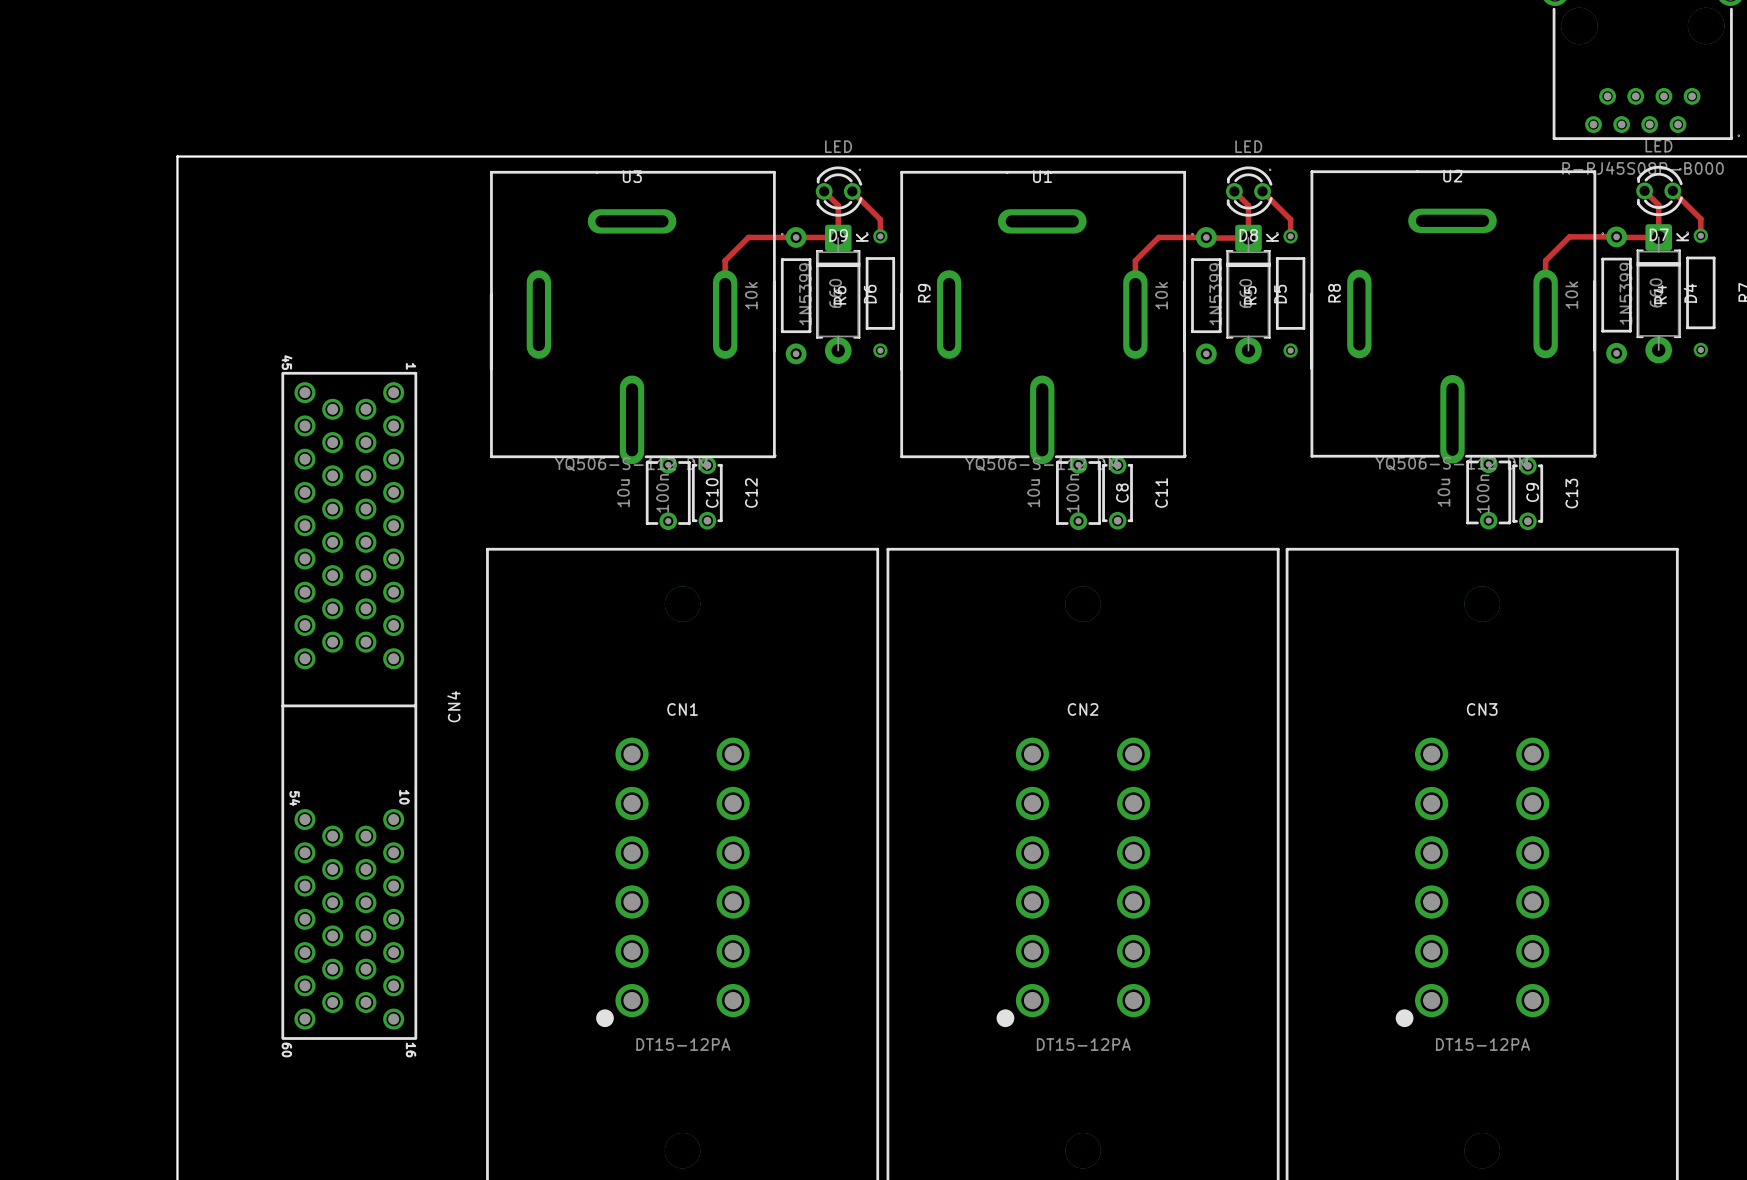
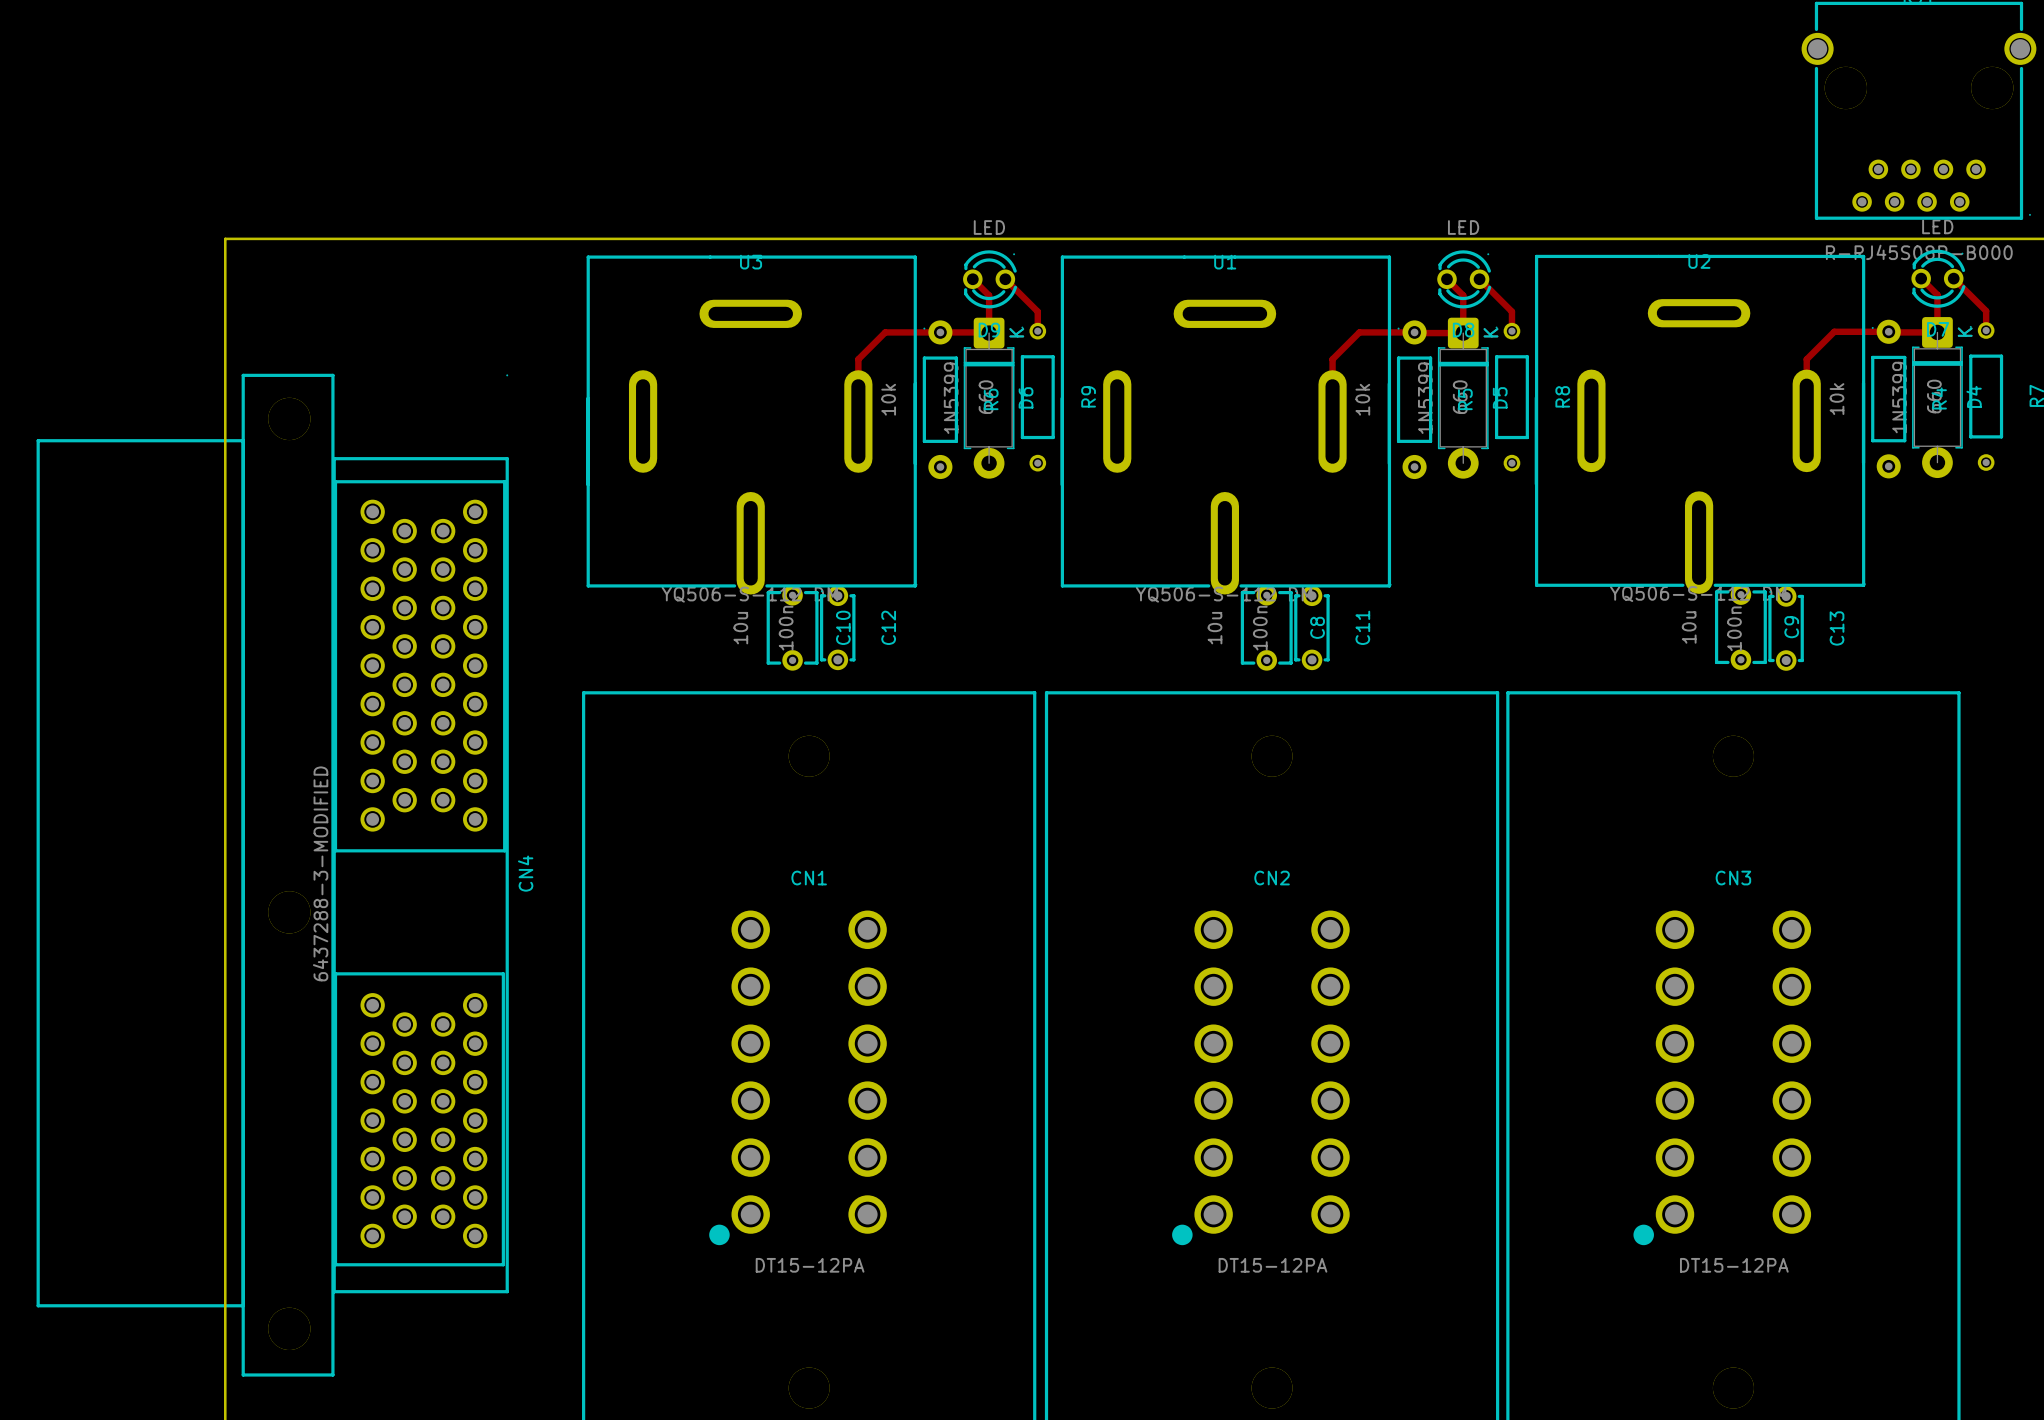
CN4 footprint: [281, 371, 418, 1040] -> [36, 373, 509, 1377]
CN4 value: none -> 6437288-3-MODIFIED (320, 873)
CN4 name position: CN4 (453, 706) -> CN4 (525, 873)

